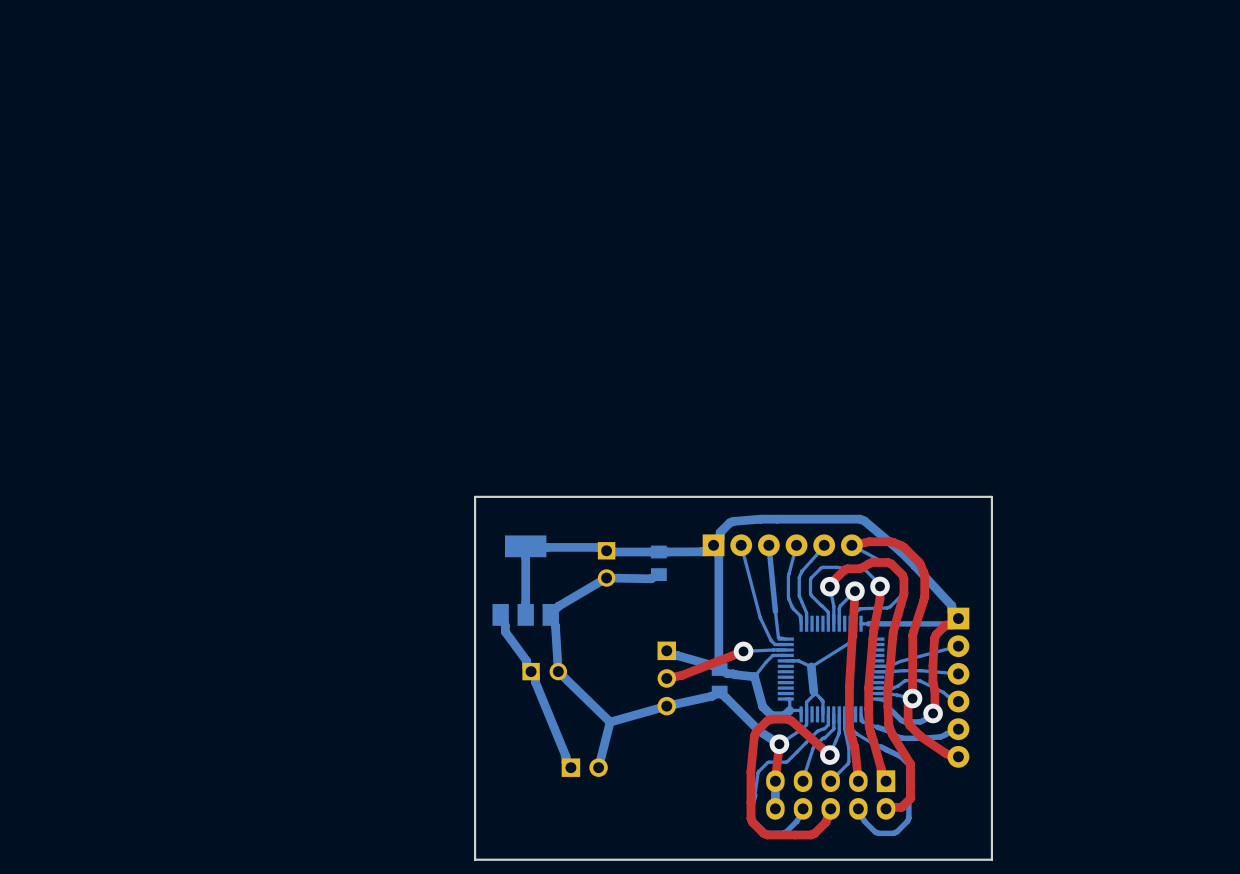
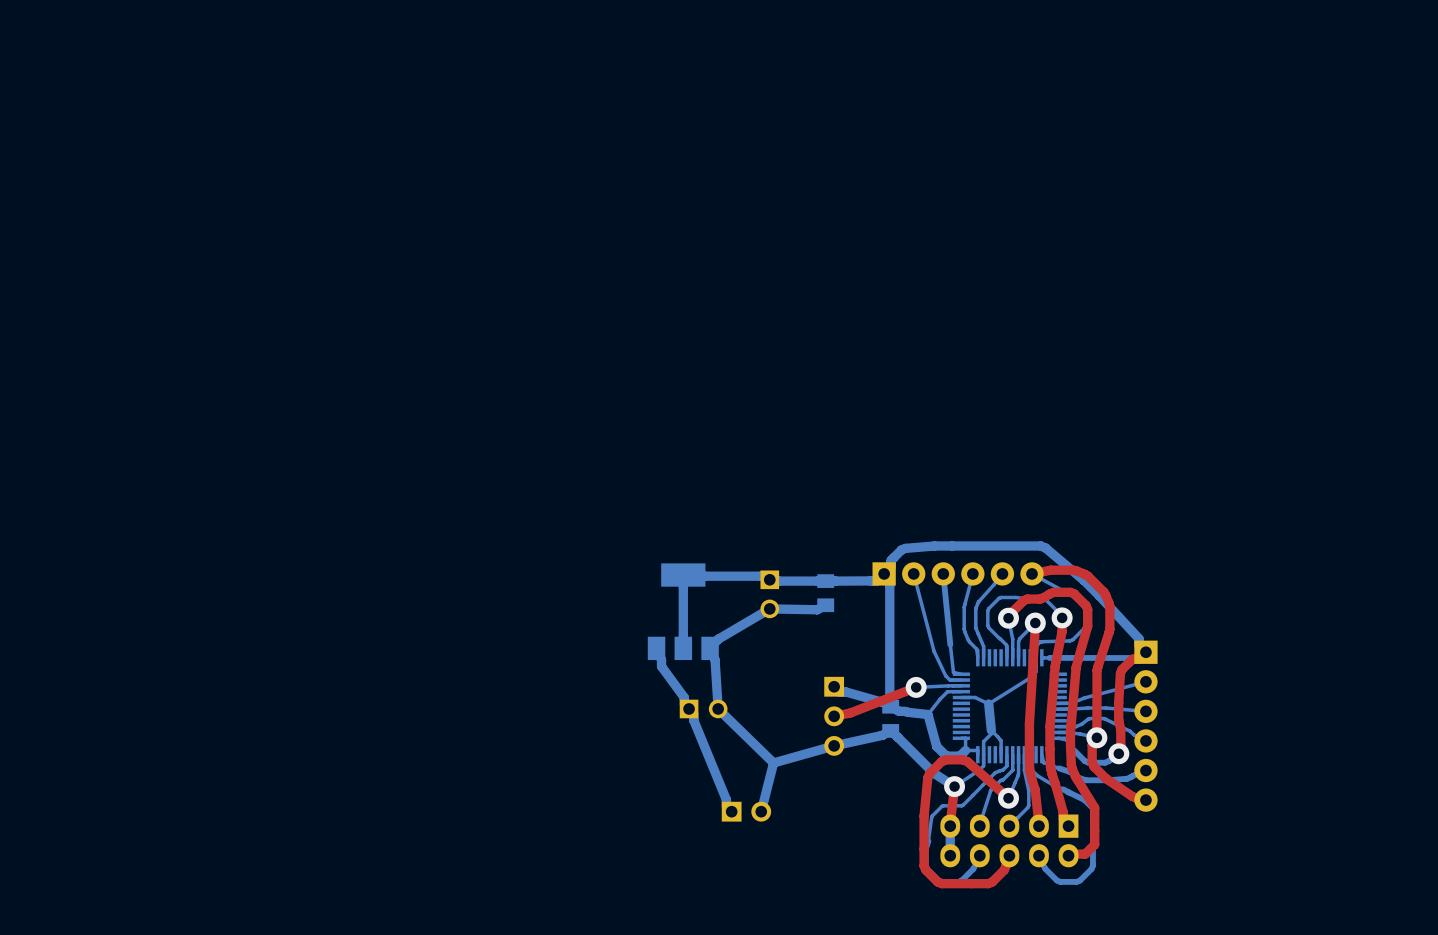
board edge: (475, 496) (991, 496) (991, 859) (475, 859) (475, 496) -> none

